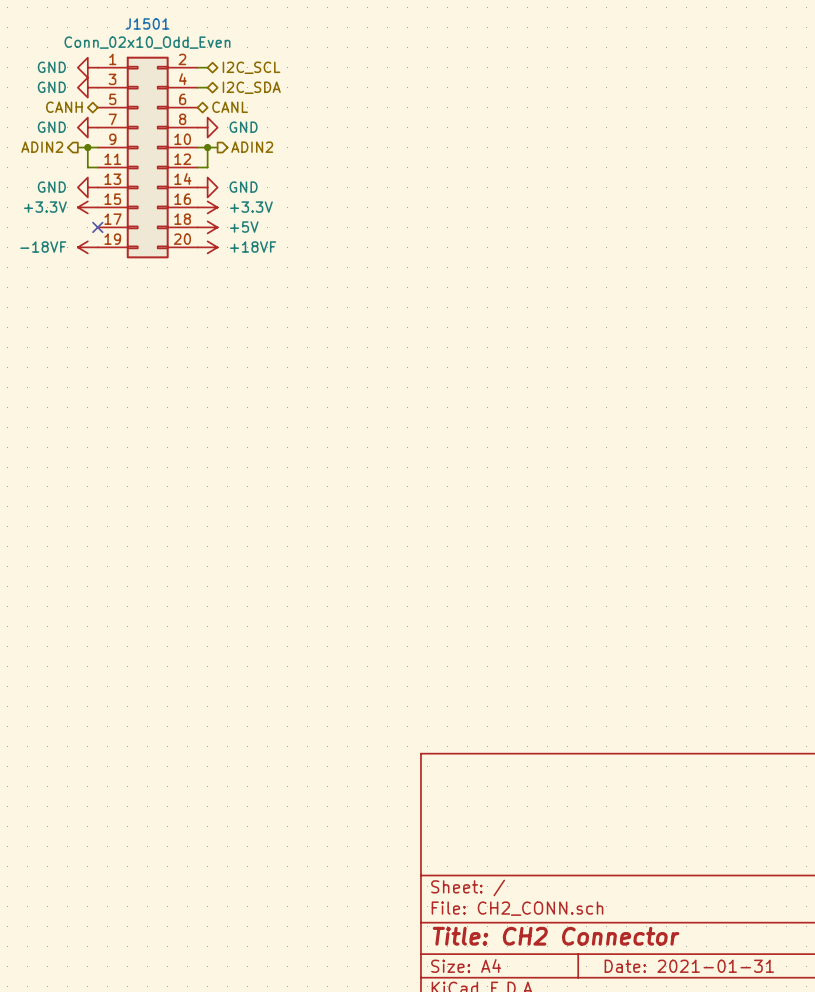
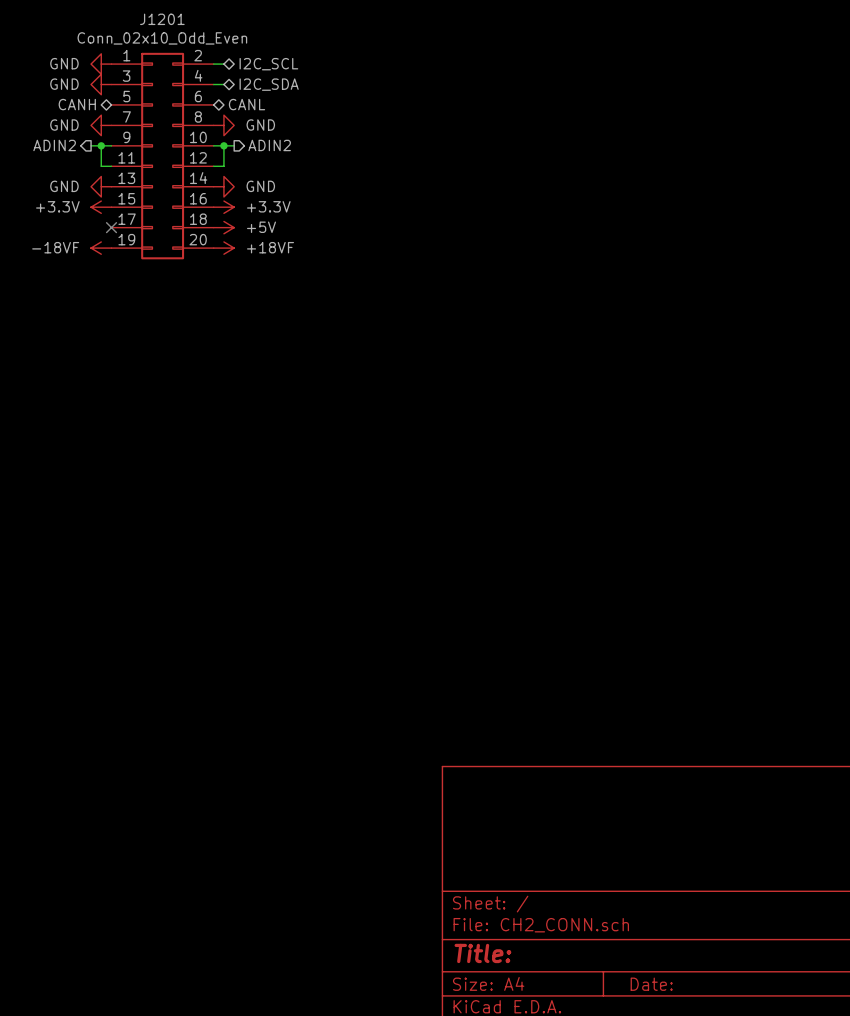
J1501 name: J1501 (147, 23) -> J1201 (162, 19)
title block: Title: CH2 Connector (556, 936) -> Title: (482, 953)
title block: Date: 2021-01-31 (689, 966) -> Date: (651, 984)

